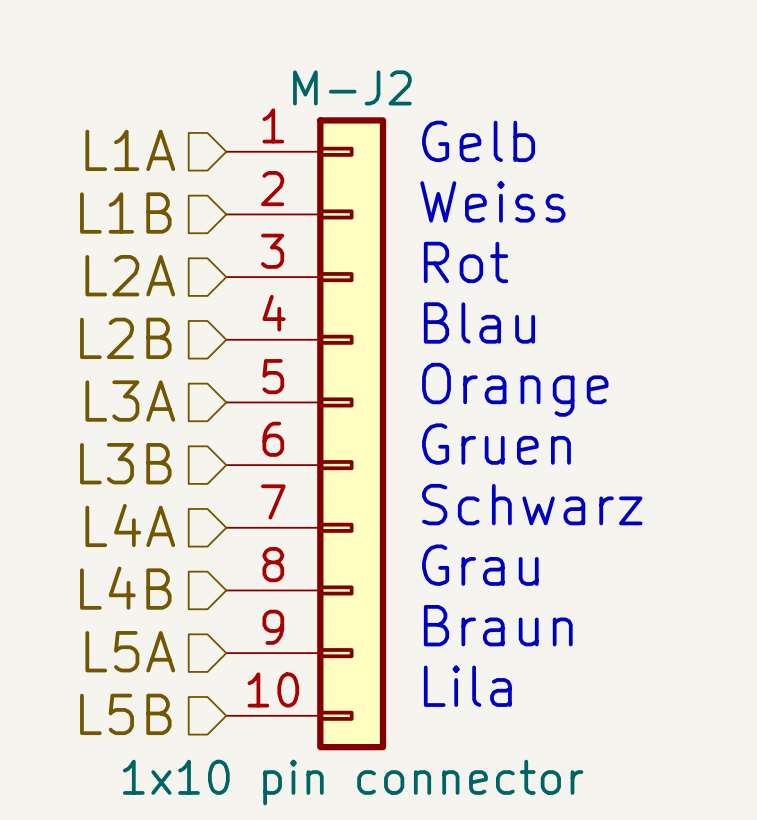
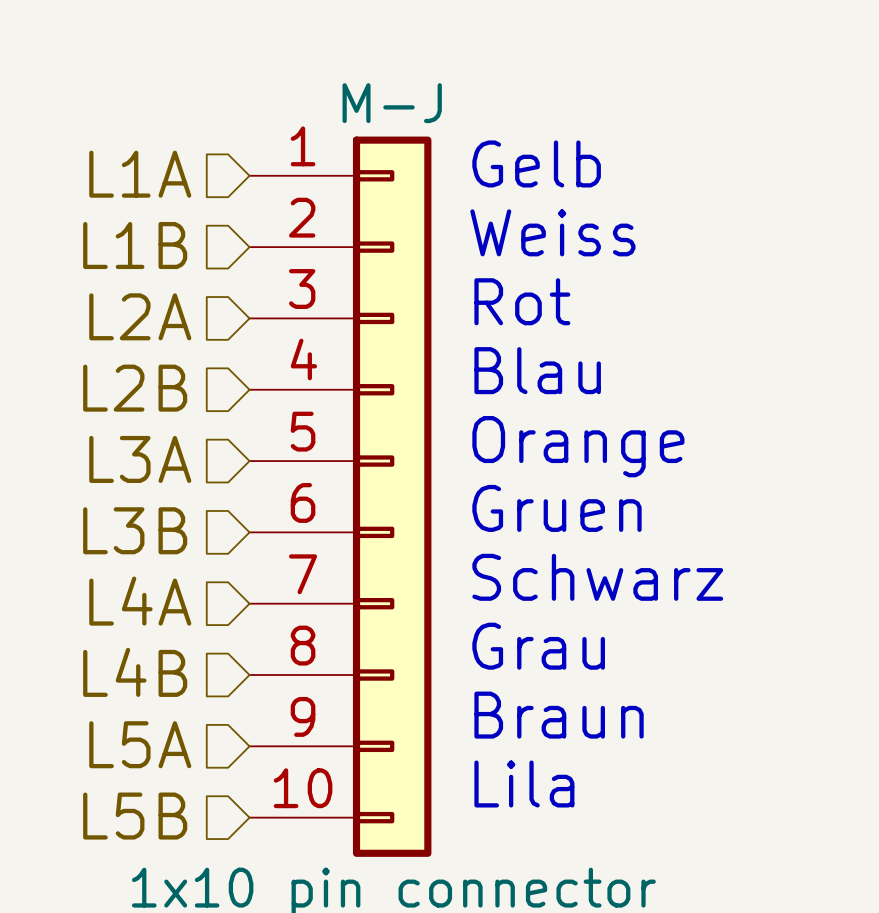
M-J2 name: M-J2 (352, 87) -> M-J (392, 103)

